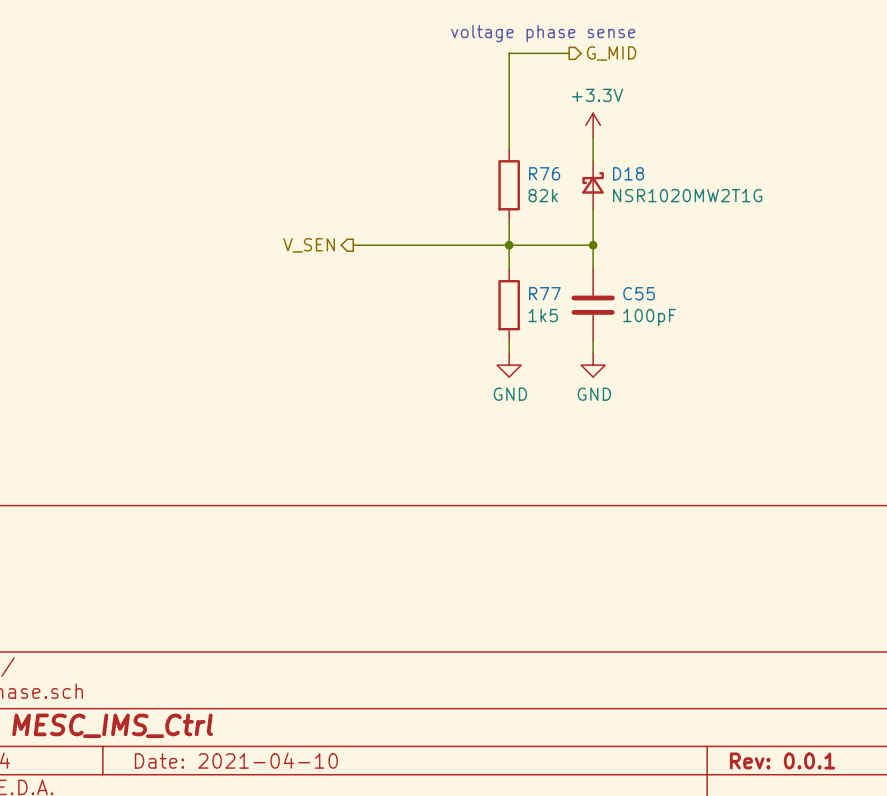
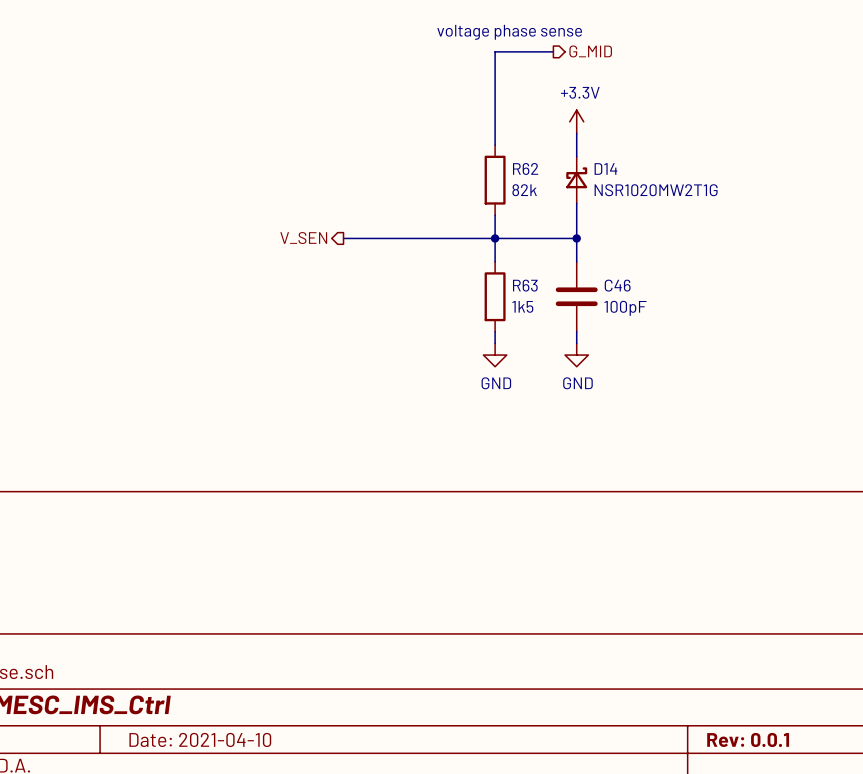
R76 name: R76 (544, 173) -> R62 (525, 168)
D18 name: D18 (628, 173) -> D14 (605, 168)
R77 name: R77 (544, 293) -> R63 (525, 285)
C55 name: C55 (639, 293) -> C46 (617, 285)

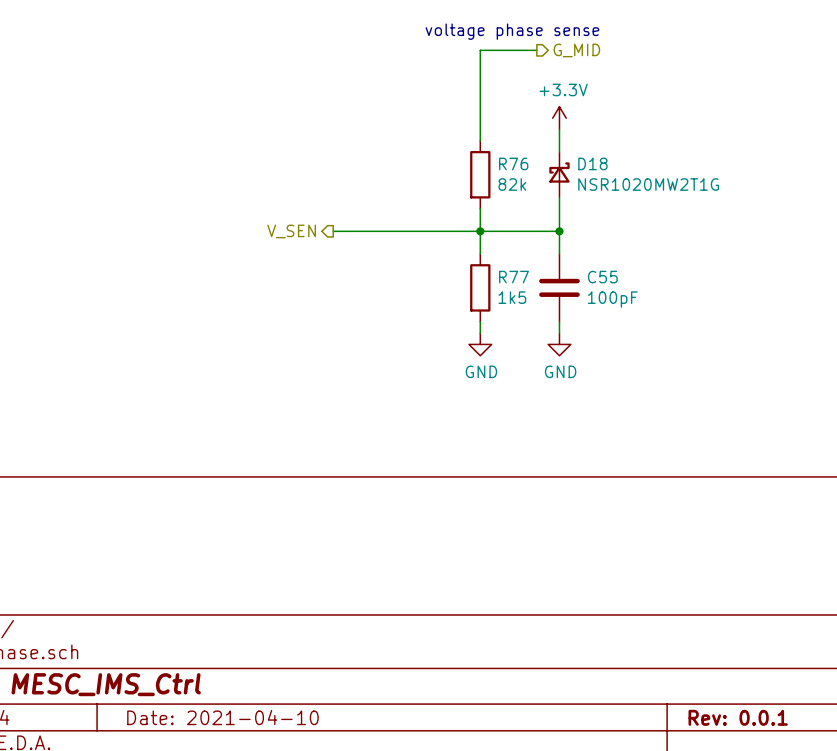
R62 name: R62 (525, 168) -> R76 (513, 163)
D14 name: D14 (605, 168) -> D18 (592, 163)
R63 name: R63 (525, 285) -> R77 (513, 277)
C46 name: C46 (617, 285) -> C55 (602, 277)

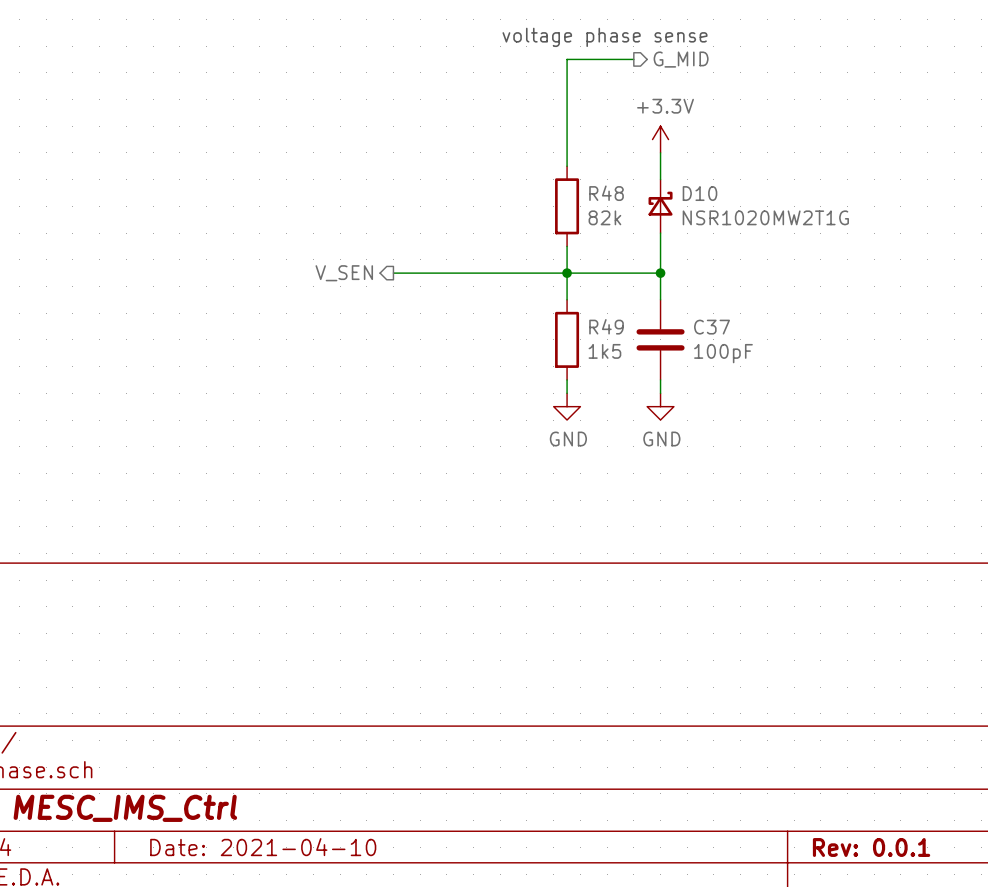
R76 name: R76 (513, 163) -> R48 (606, 193)
D18 name: D18 (592, 163) -> D10 (700, 193)
R77 name: R77 (513, 277) -> R49 (606, 326)
C55 name: C55 (602, 277) -> C37 (712, 327)

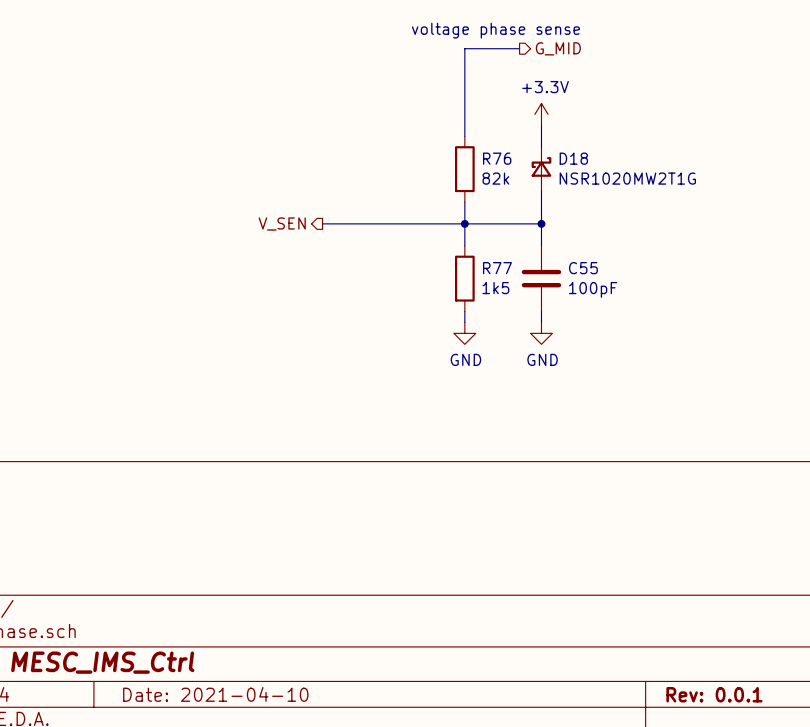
R48 name: R48 (606, 193) -> R76 (497, 158)
D10 name: D10 (700, 193) -> D18 (573, 158)
R49 name: R49 (606, 326) -> R77 (497, 268)
C37 name: C37 (712, 327) -> C55 (583, 268)

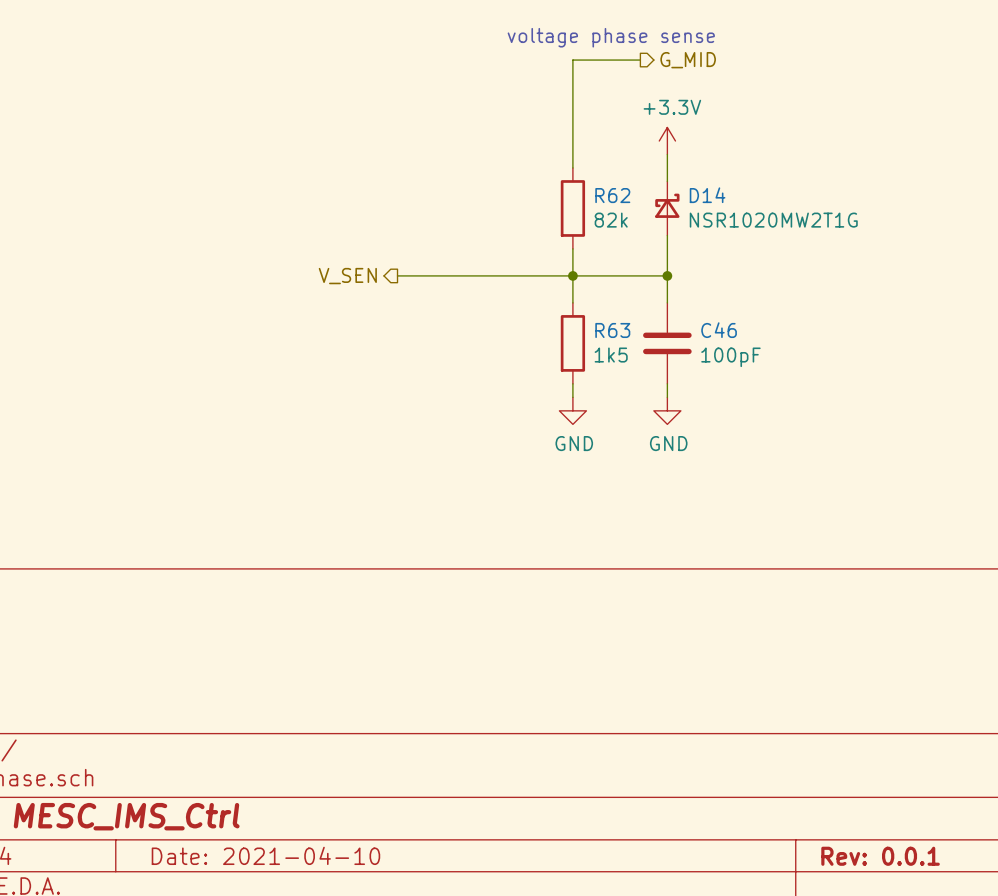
R76 name: R76 (497, 158) -> R62 (612, 195)
D18 name: D18 (573, 158) -> D14 (707, 195)
R77 name: R77 (497, 268) -> R63 (612, 330)
C55 name: C55 (583, 268) -> C46 (719, 330)

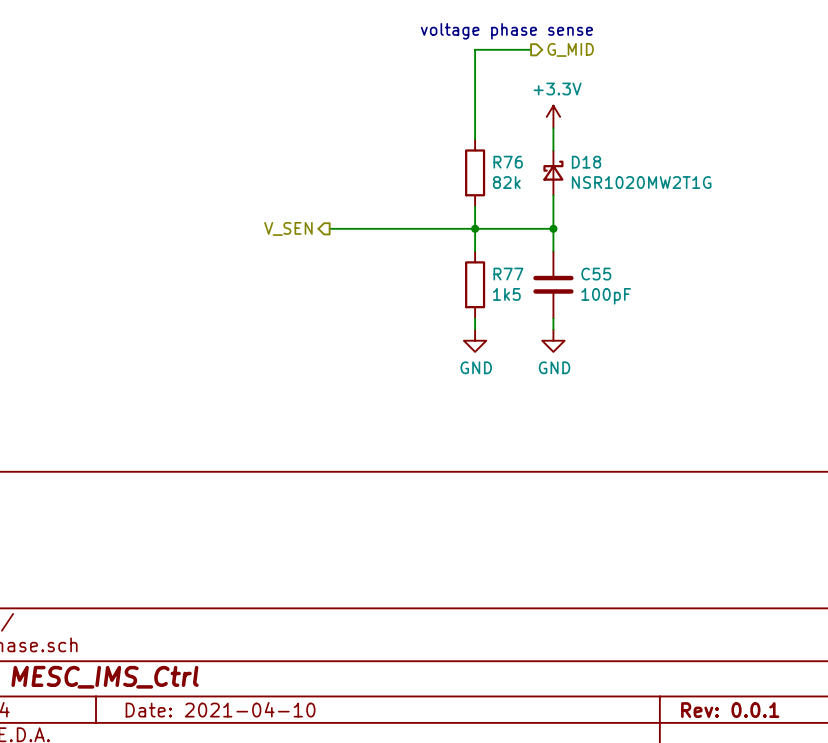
R62 name: R62 (612, 195) -> R76 (508, 162)
D14 name: D14 (707, 195) -> D18 (586, 162)
R63 name: R63 (612, 330) -> R77 (508, 274)
C46 name: C46 (719, 330) -> C55 (596, 274)

